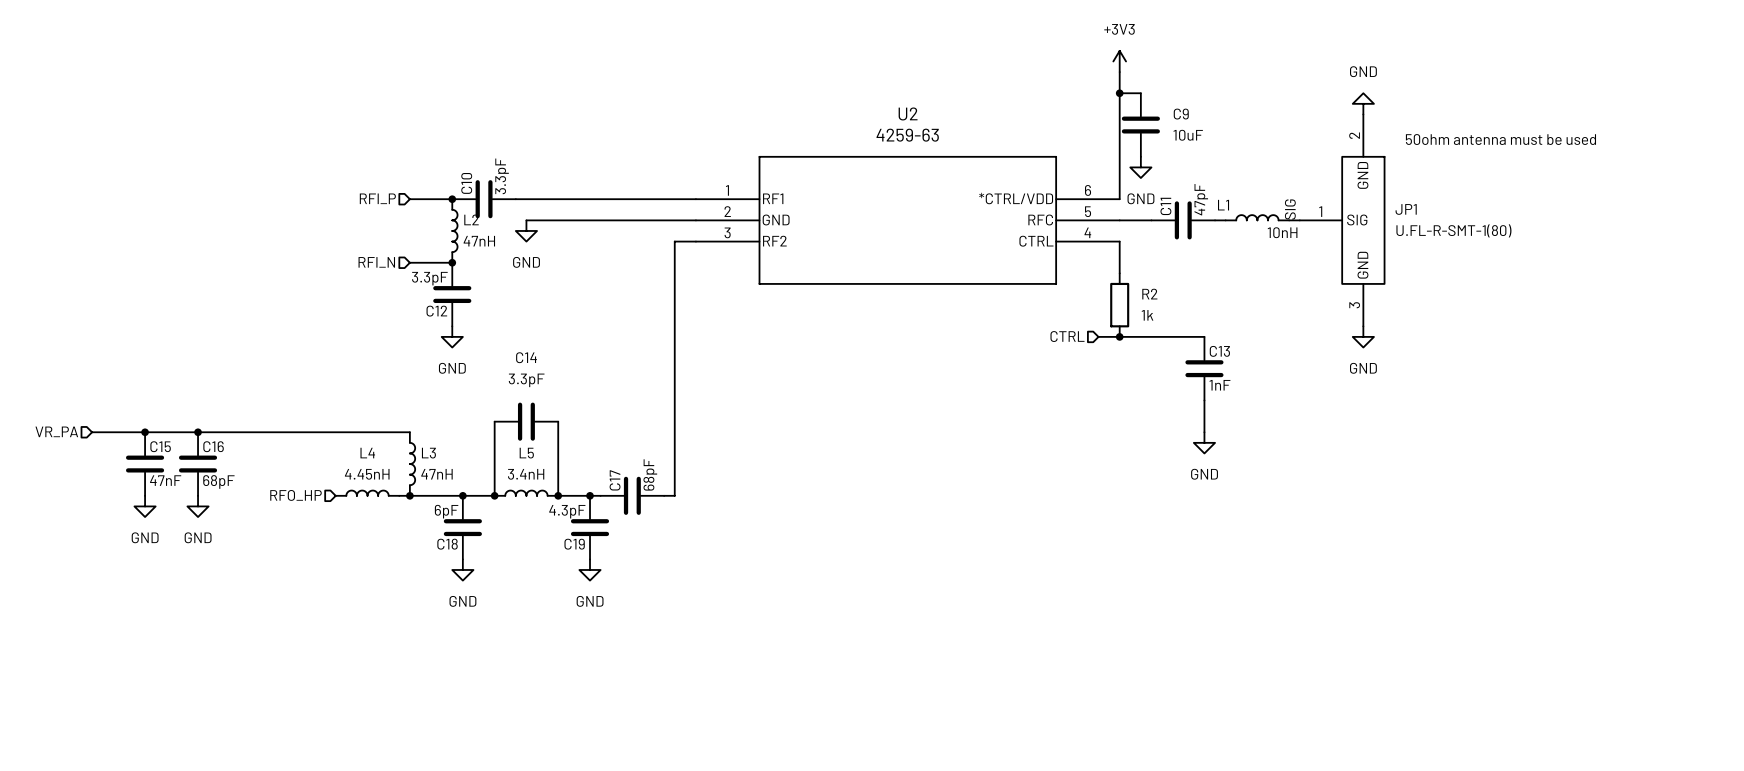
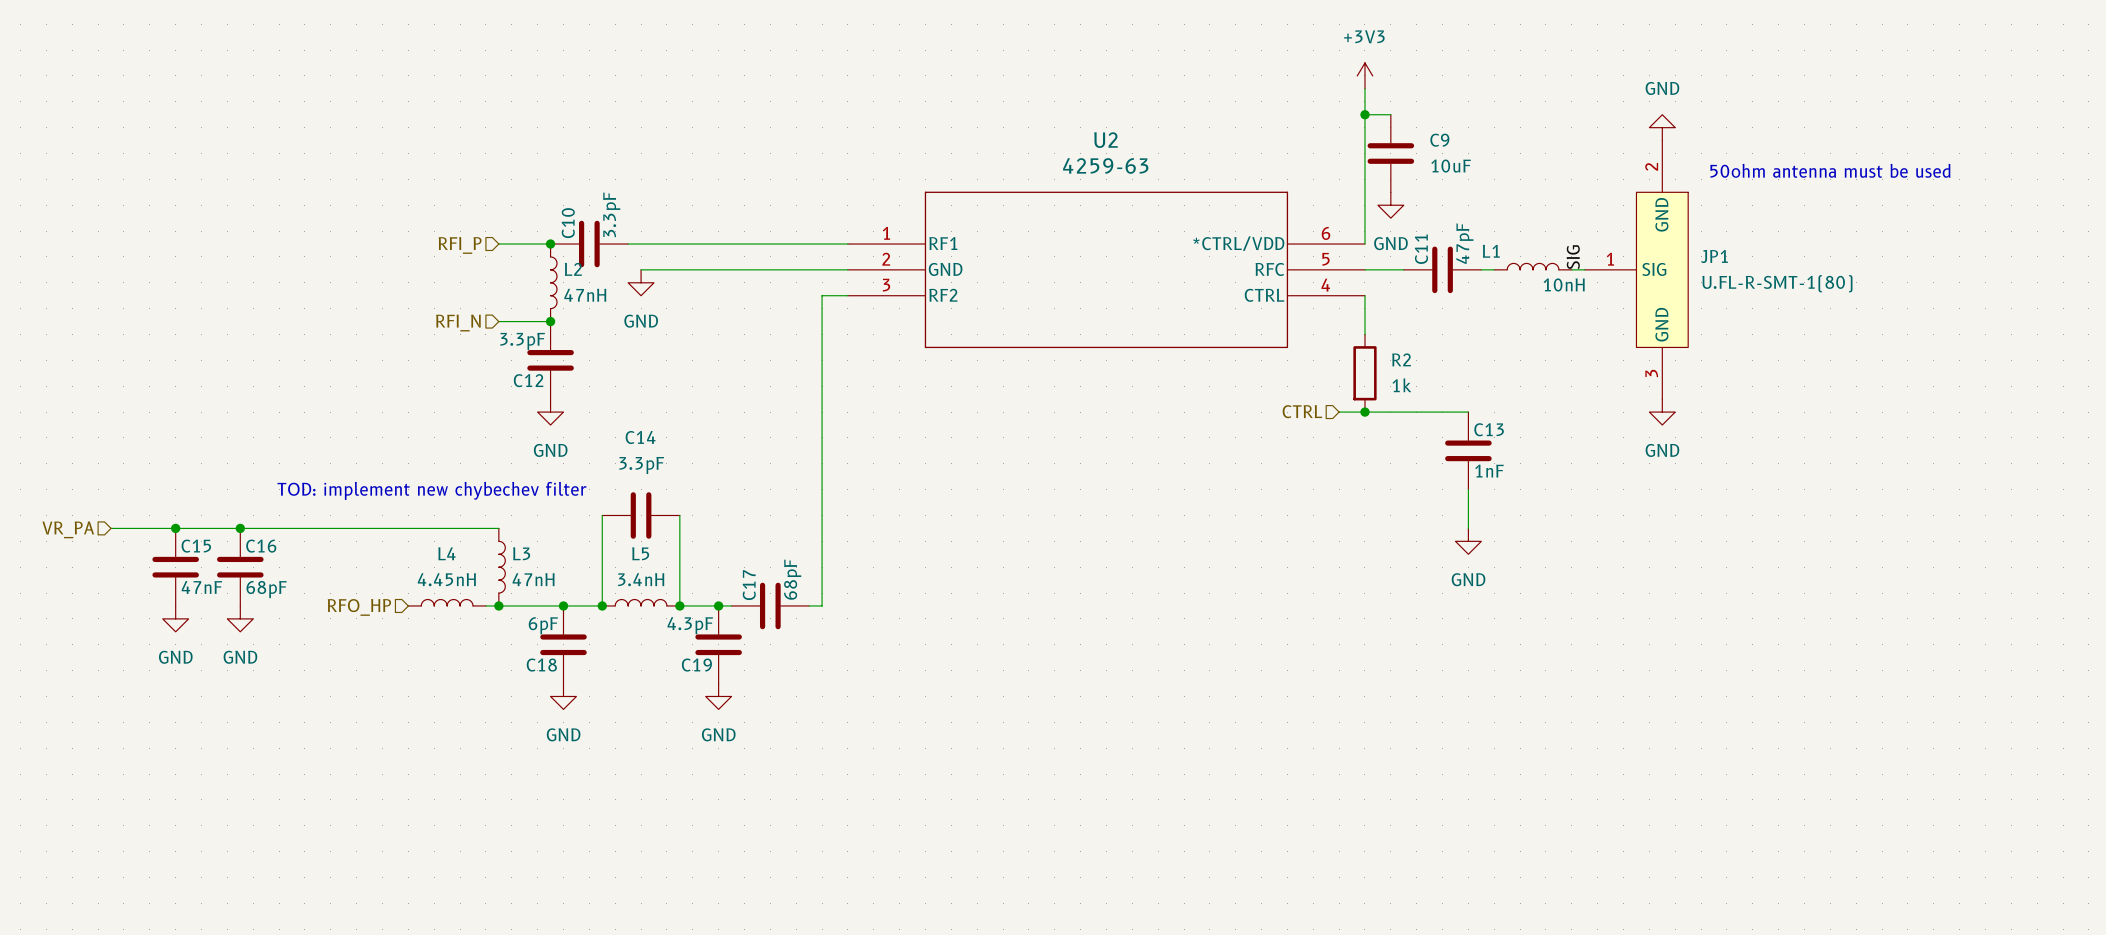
text: none -> TOD: implement new chybechev filter (431, 490)

